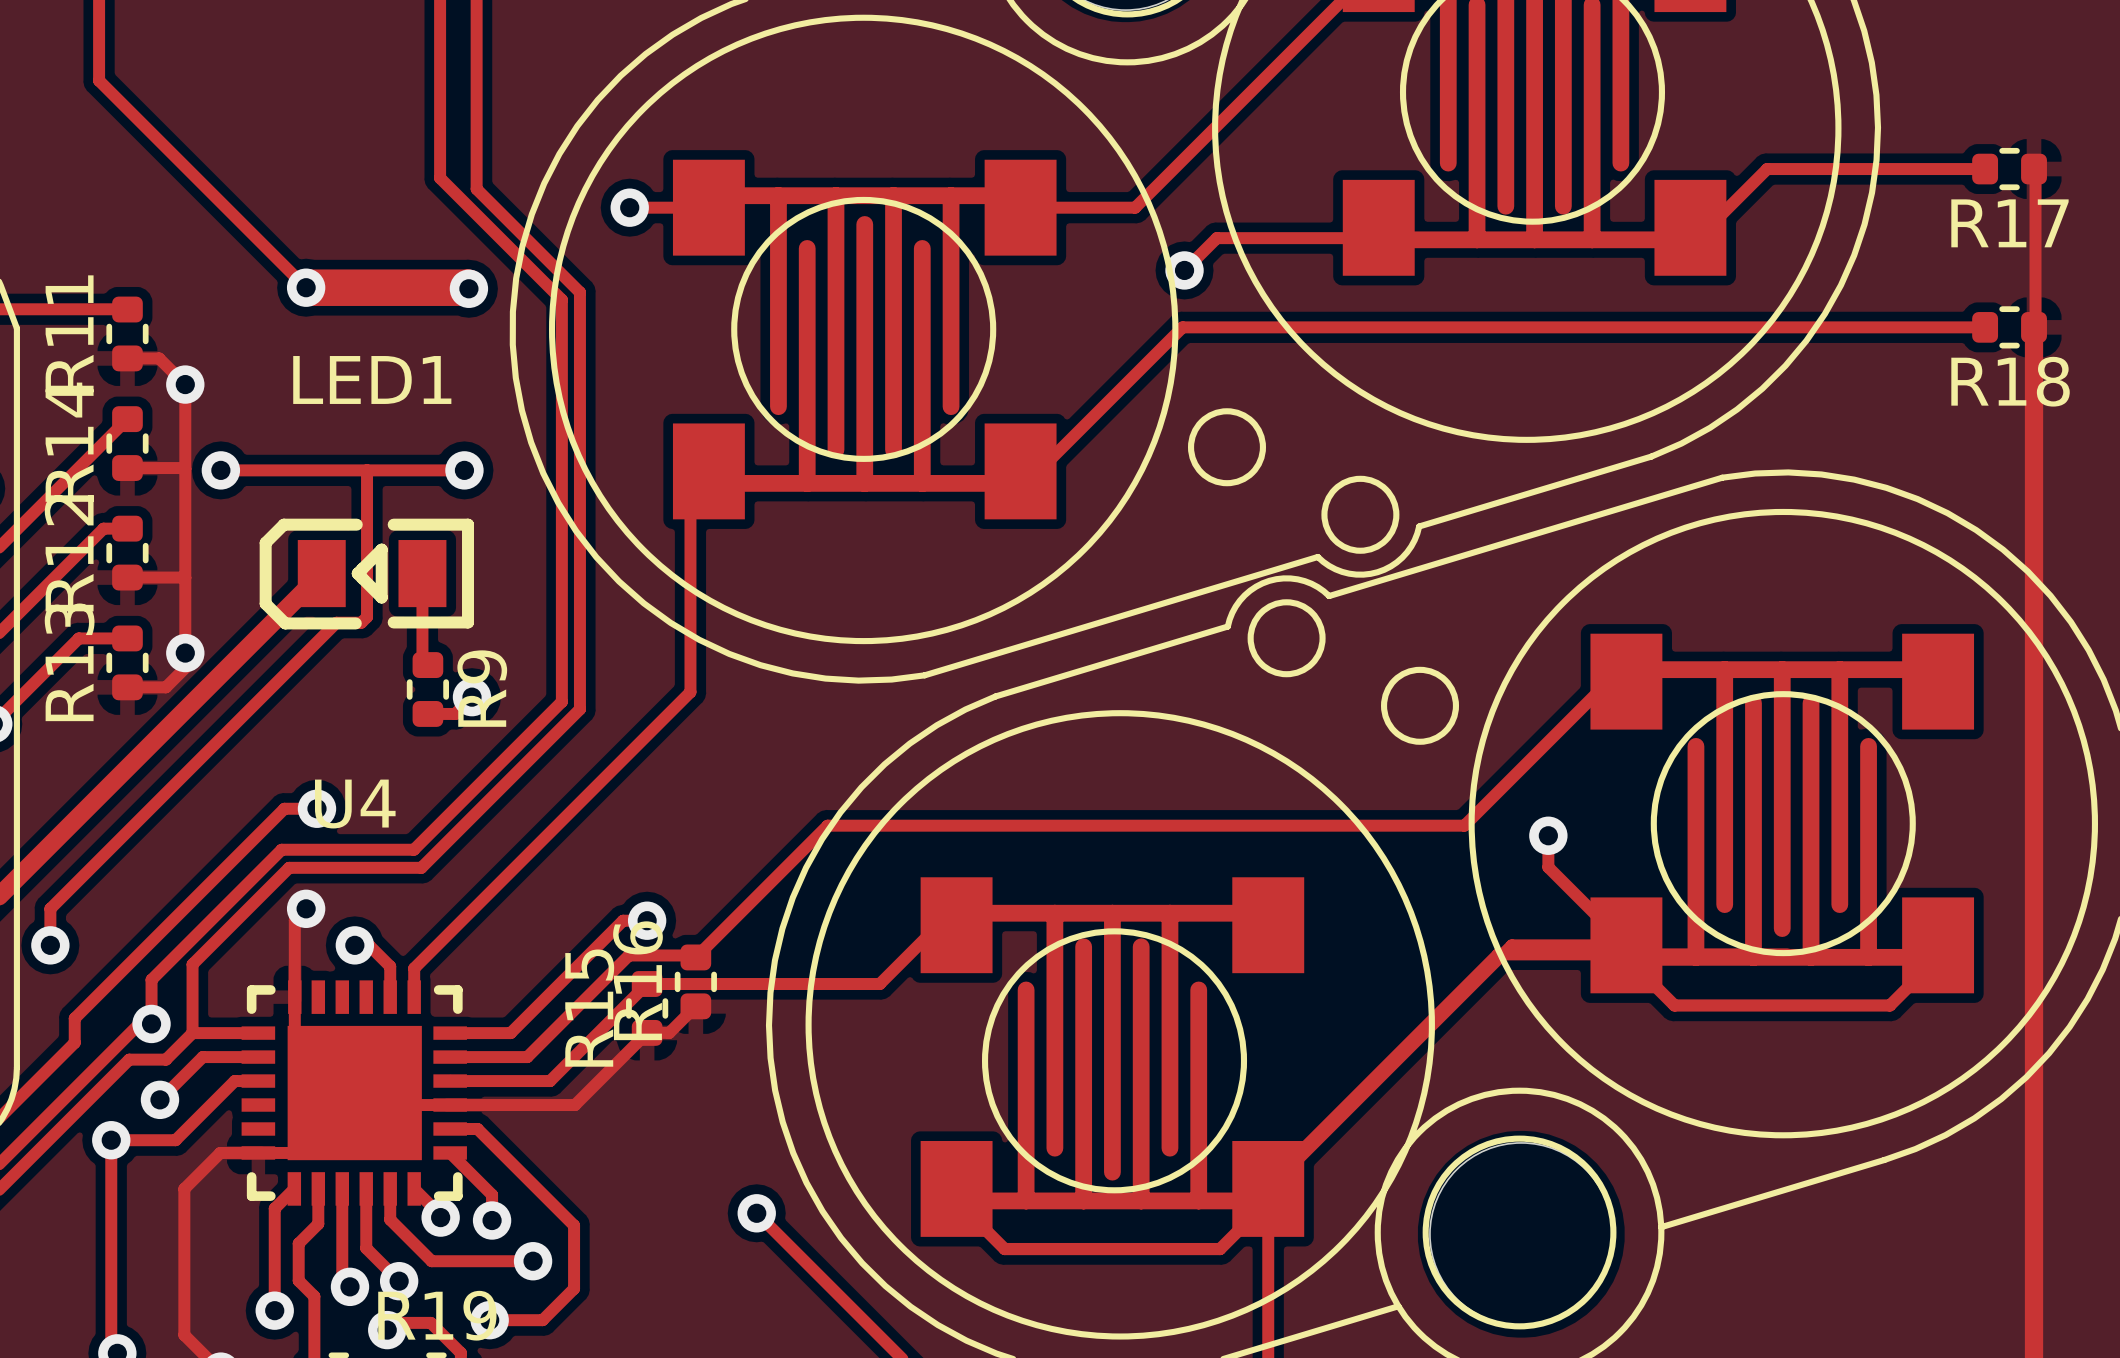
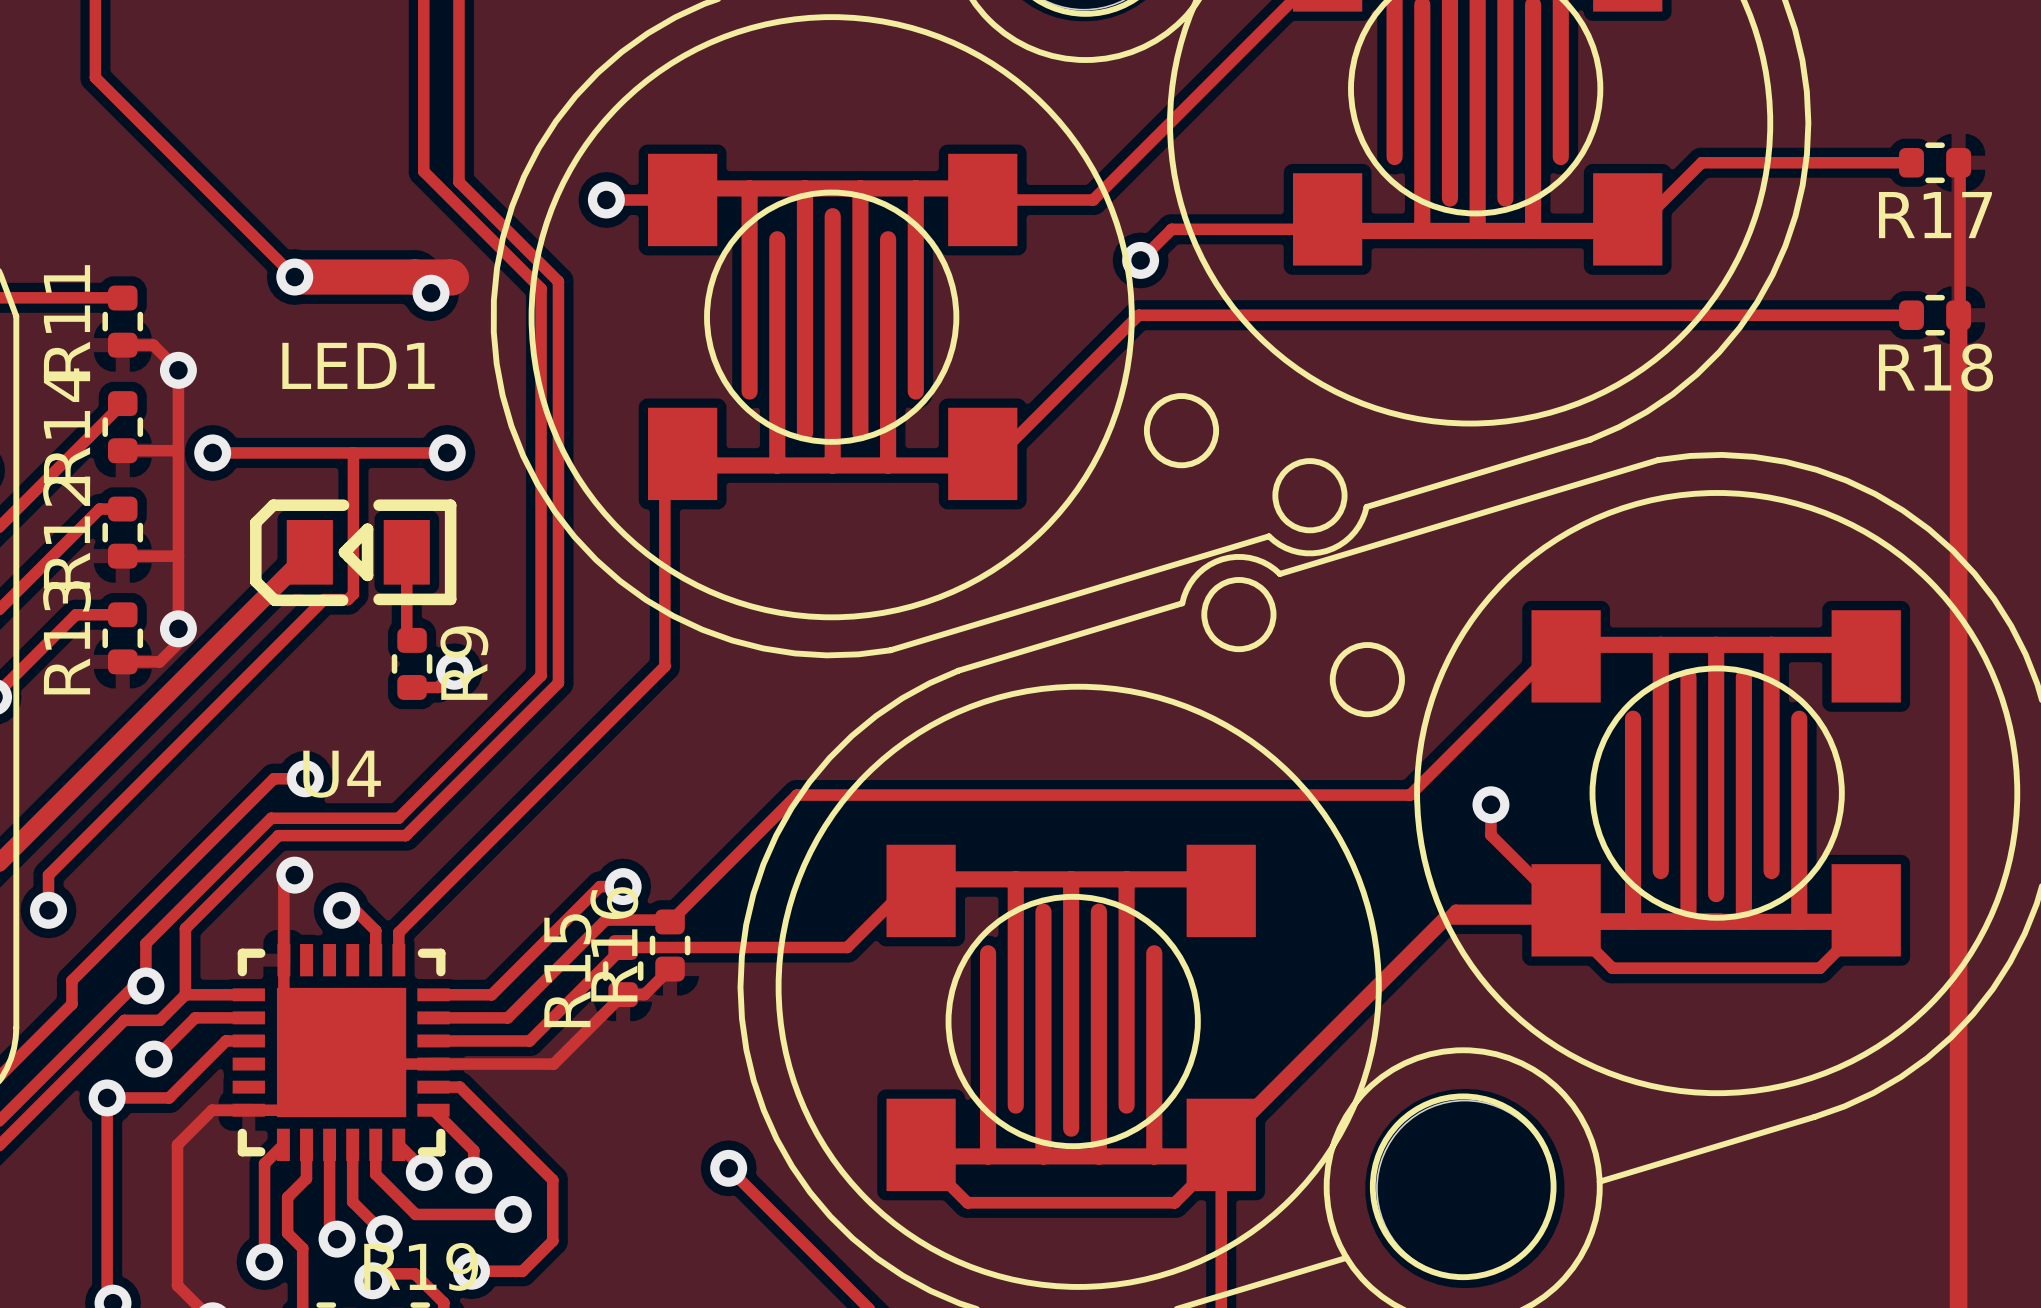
via position: (468, 288) -> (431, 293)

